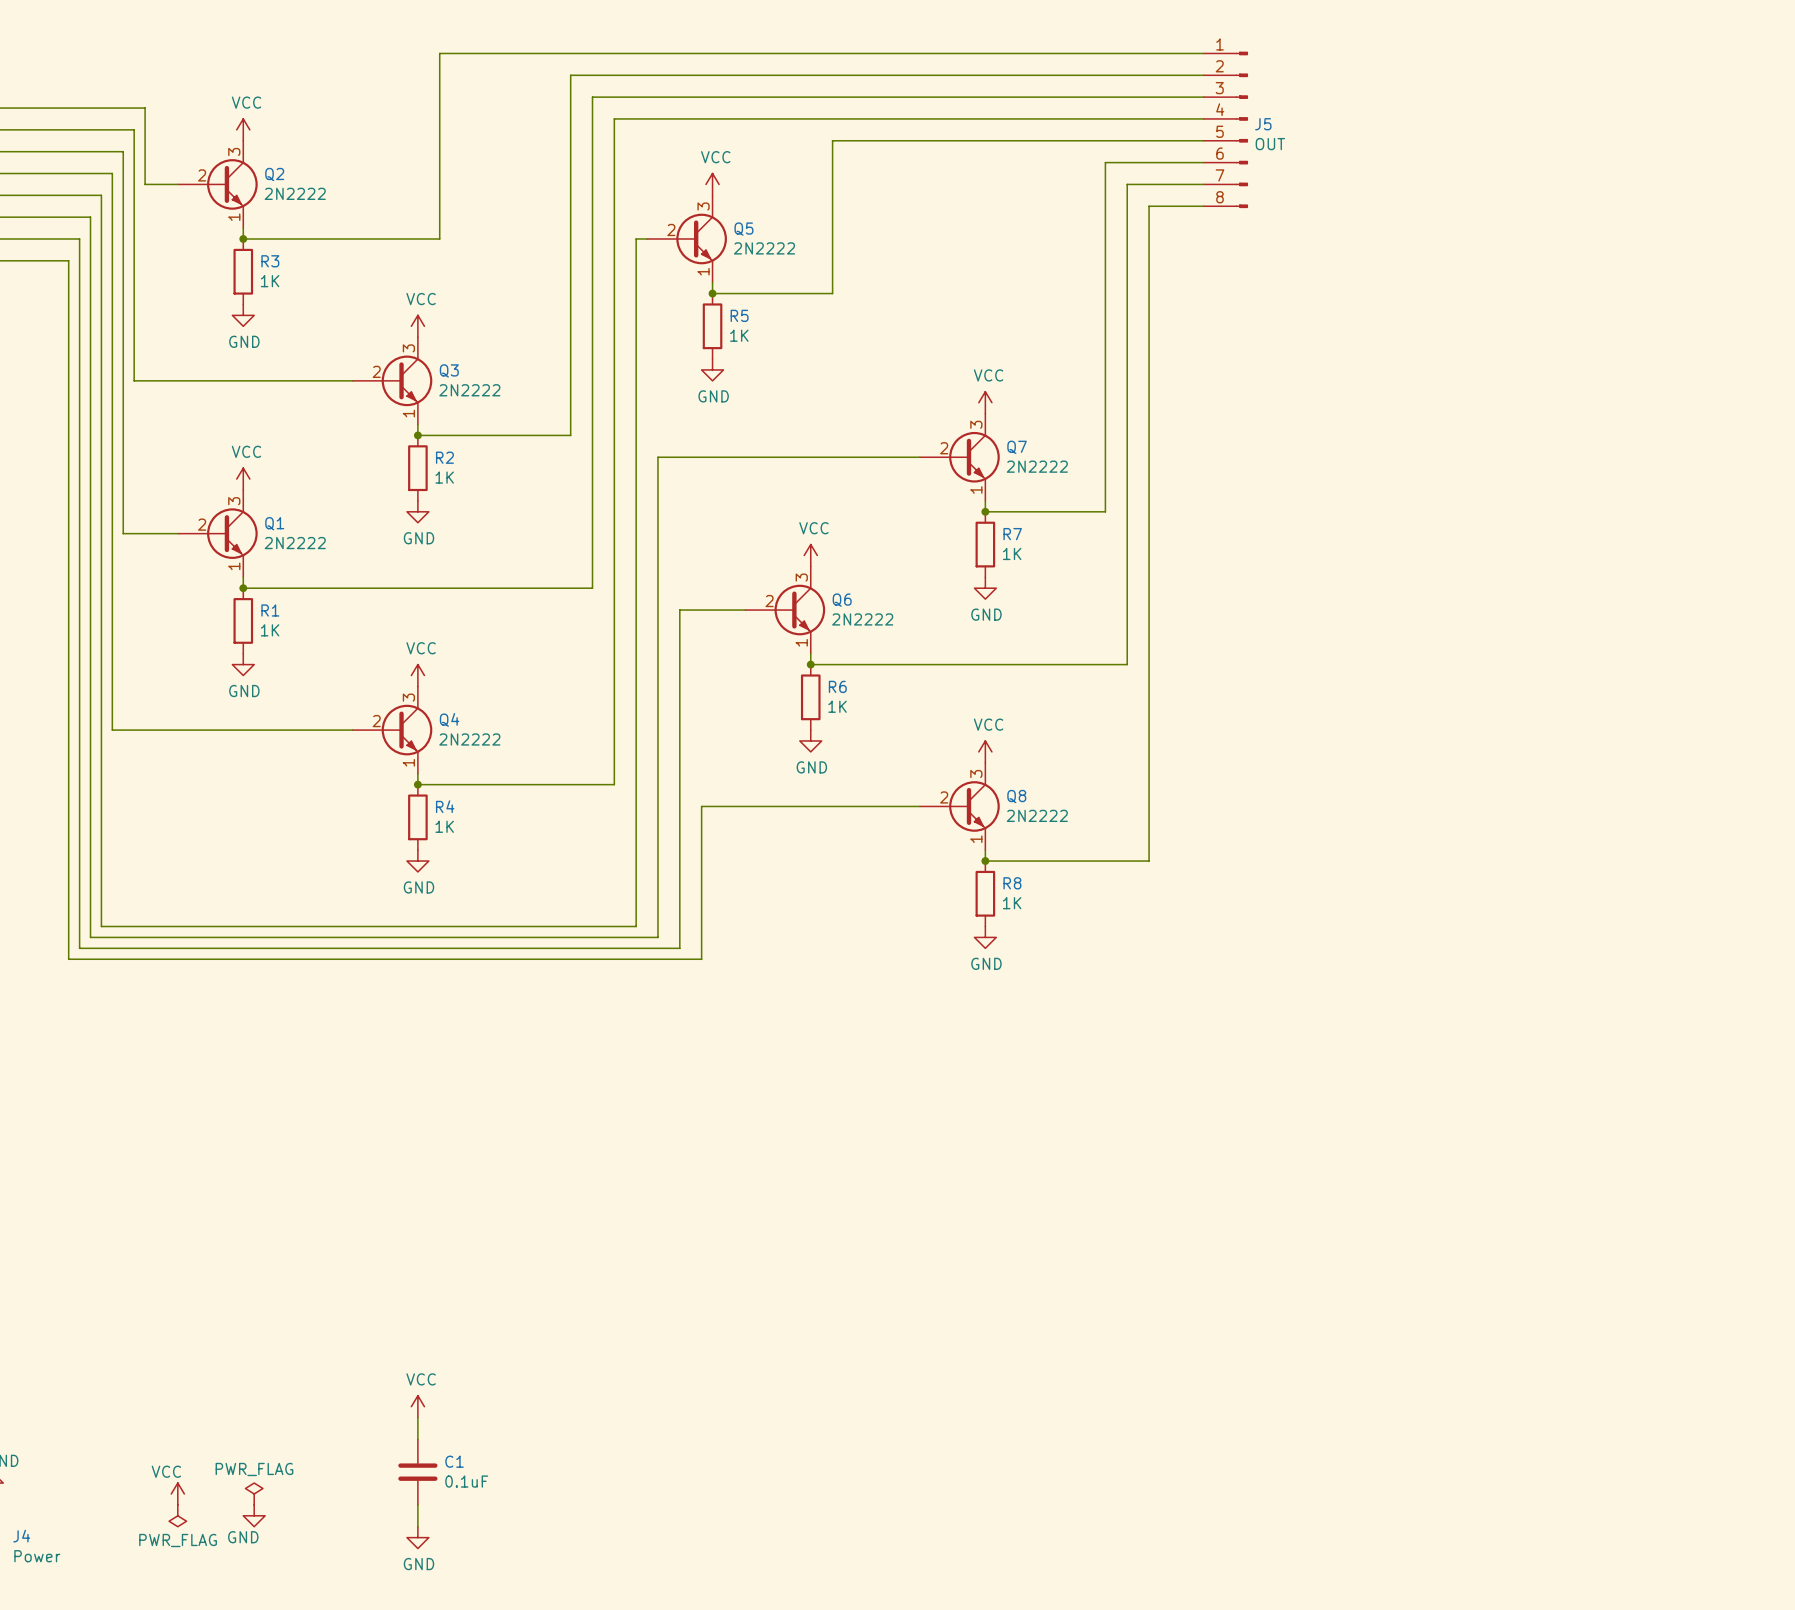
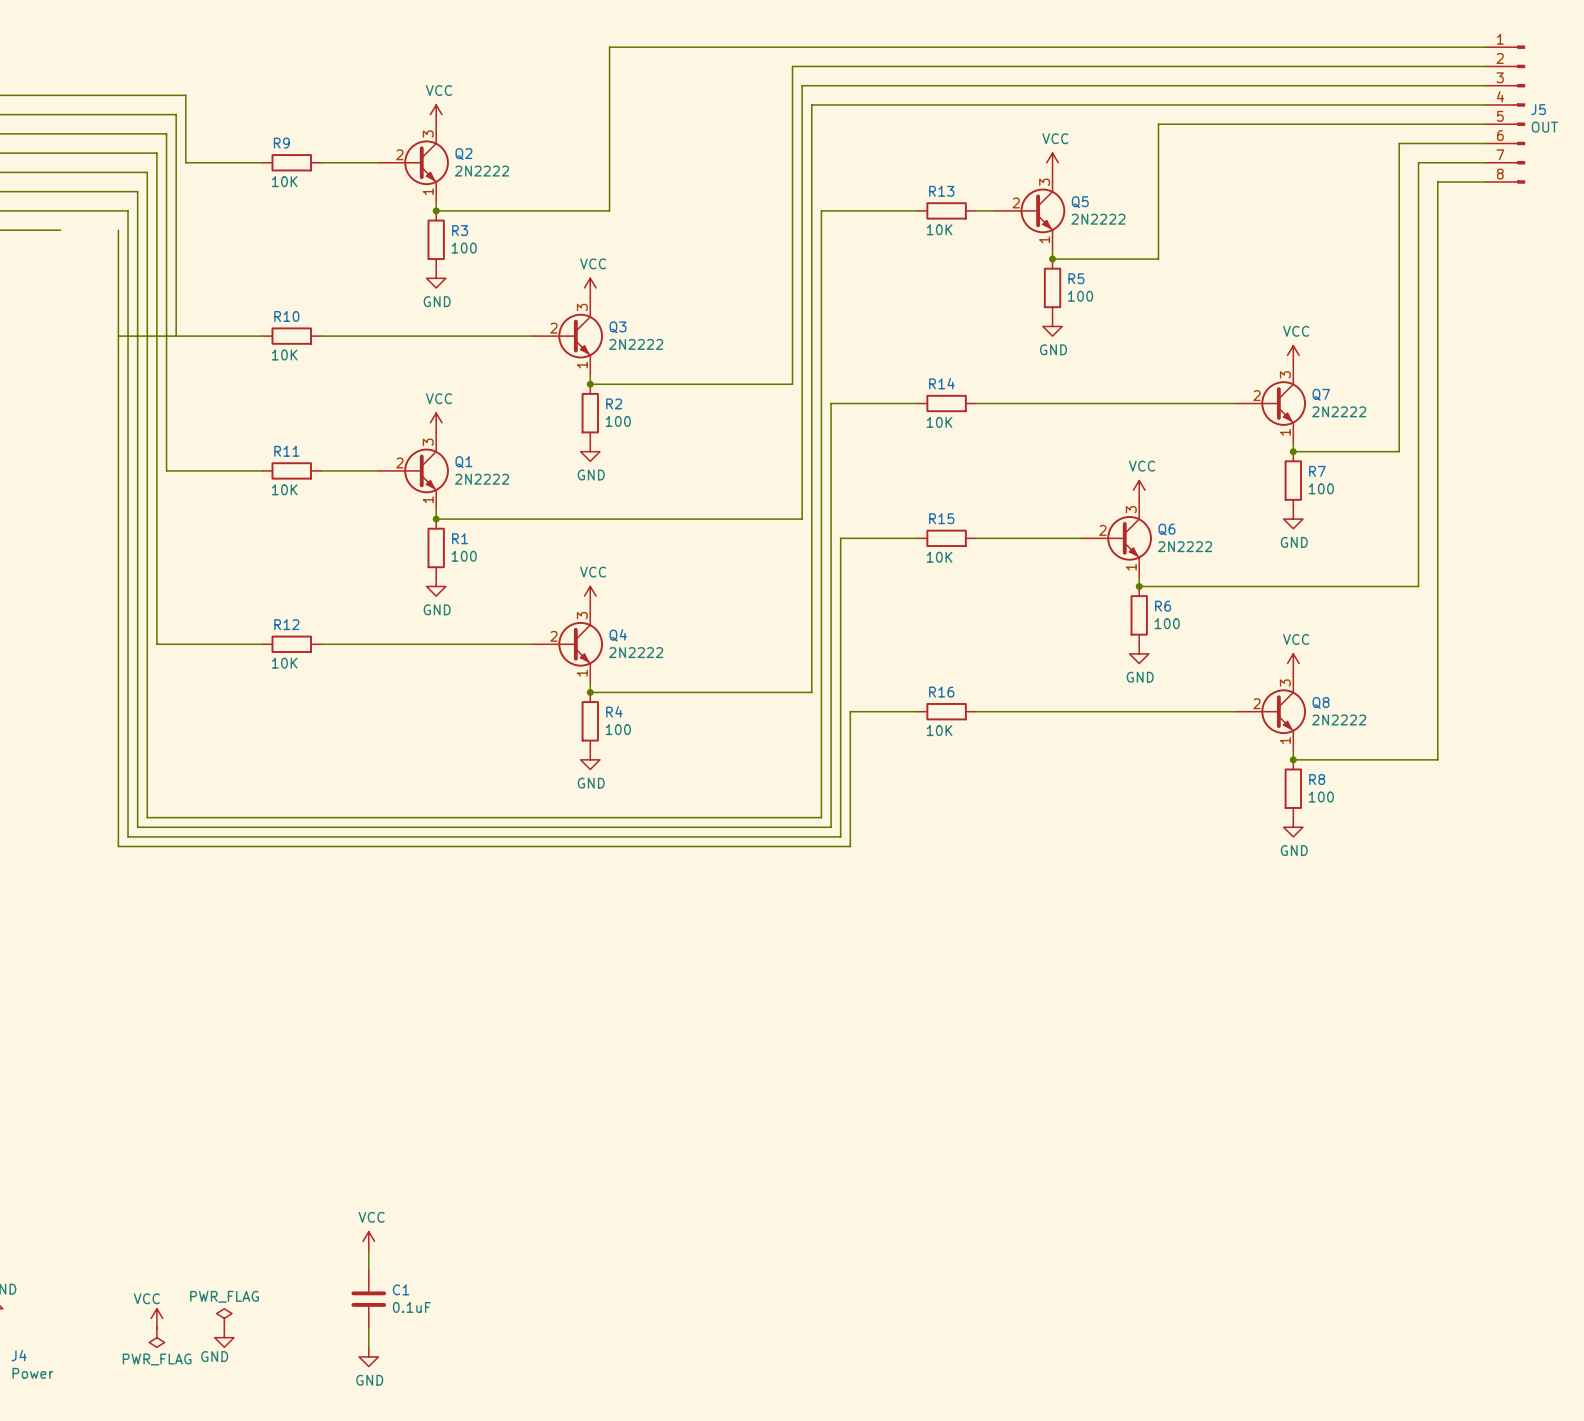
wire: (690, 53) (439, 53) (439, 238) (243, 238) (243, 228) -> (609, 47) (609, 210) (571, 210)
wire: none -> (1062, 47) (1485, 47)
wire: (898, 75) (570, 75) (570, 435) (417, 435) (417, 424) -> (792, 66) (792, 384) (590, 384) (590, 374)
wire: none -> (1062, 66) (1485, 66)
wire: (908, 97) (592, 97) (592, 588) -> (802, 85) (802, 519) (522, 519)
wire: none -> (1062, 85) (1485, 85)
wire: (145, 108) (145, 184) (177, 184) -> (128, 95) (185, 95) (185, 162) (262, 162)
wire: (919, 118) (614, 118) (614, 784) (417, 784) (417, 773) -> (811, 104) (811, 692) (590, 692) (590, 682)
wire: none -> (1062, 104) (1485, 104)
wire: (134, 129) (134, 260) -> (118, 114) (176, 114) (176, 336)
power symbol: VCC (243, 129) -> none
power symbol: none -> VCC (436, 114)
J5 position: (1225, 129) -> (1505, 114)
wire: (1203, 140) (832, 140) (832, 293) (712, 293) (712, 282) -> none
wire: none -> (1485, 124) (1158, 124) (1158, 259) (1052, 259) (1052, 249)
wire: (123, 151) (123, 533) (177, 533) -> (108, 133) (166, 133) (166, 470) (262, 470)
wire: (1203, 162) (1105, 162) (1105, 511) (985, 511) (985, 500) -> none
wire: none -> (1485, 143) (1399, 143) (1399, 451) (1293, 451) (1293, 442)
wire: (112, 173) (112, 730) (177, 730) -> (99, 153) (156, 153) (156, 644)
Q2 position: (217, 184) -> (413, 162)
R9: none -> 10K (291, 162)
wire: none -> (320, 162) (378, 162)
power symbol: VCC (712, 184) -> none
power symbol: none -> VCC (1052, 162)
wire: (1203, 184) (1127, 184) (1127, 664) (810, 664) (810, 653) -> none
wire: none -> (1485, 162) (1418, 162) (1418, 586) (1139, 586) (1139, 576)
wire: (101, 195) (101, 926) (166, 926) -> (89, 172) (147, 172) (147, 817)
wire: (1203, 206) (1149, 206) (1149, 861) (985, 861) (985, 850) -> none
wire: none -> (1485, 182) (1437, 182) (1437, 759) (1293, 759) (1293, 750)
wire: (90, 217) (90, 937) (155, 937) -> (79, 191) (137, 191) (137, 827)
wire: none -> (436, 201) (436, 210) (561, 210)
wire: (79, 238) (79, 948) (145, 948) -> (70, 210) (128, 210) (128, 836)
junction: (243, 238) -> none
junction: none -> (436, 210)
wire: (636, 238) (636, 926) -> (917, 210) (821, 210) (821, 817) (561, 817)
Q5 position: (687, 238) -> (1030, 210)
R13: none -> 10K (946, 210)
wire: none -> (975, 210) (994, 210)
wire: (68, 260) (68, 959) (134, 959) -> (118, 336) (118, 846)
R3 position: (243, 271) -> (436, 239)
R3 value: 1K (270, 281) -> 100 (464, 248)
junction: (712, 293) -> none
junction: none -> (1052, 259)
power symbol: GND (243, 315) -> none
power symbol: none -> GND (436, 278)
power symbol: VCC (417, 326) -> none
power symbol: none -> VCC (590, 287)
R5 position: (712, 326) -> (1052, 287)
R5 value: 1K (739, 335) -> 100 (1080, 296)
power symbol: GND (712, 369) -> none
power symbol: none -> GND (1052, 326)
wire: (297, 380) (352, 380) -> none
R10: none -> 10K (291, 336)
wire: none -> (320, 336) (532, 336)
Q3 position: (392, 380) -> (567, 336)
power symbol: VCC (985, 402) -> none
power symbol: none -> VCC (1293, 355)
junction: (417, 435) -> none
junction: none -> (590, 384)
wire: (919, 457) (657, 457) (657, 937) -> (917, 403) (831, 403) (831, 827) (580, 827)
Q7 position: (959, 457) -> (1270, 403)
R14: none -> 10K (946, 403)
wire: none -> (975, 403) (1235, 403)
R2 position: (417, 468) -> (590, 413)
R2 value: 1K (444, 477) -> 100 (618, 421)
power symbol: VCC (243, 479) -> none
power symbol: none -> VCC (436, 422)
power symbol: GND (417, 511) -> none
power symbol: none -> GND (590, 451)
junction: (985, 511) -> none
junction: none -> (1293, 451)
Q1 position: (217, 533) -> (413, 470)
R11: none -> 10K (291, 470)
wire: none -> (320, 470) (378, 470)
R7 position: (985, 544) -> (1293, 480)
R7 value: 1K (1012, 553) -> 100 (1321, 488)
power symbol: VCC (810, 555) -> none
power symbol: none -> VCC (1139, 490)
wire: (243, 577) (243, 588) (494, 588) -> (436, 509) (436, 519)
junction: (243, 588) -> none
junction: none -> (436, 519)
power symbol: GND (985, 588) -> none
power symbol: none -> GND (1293, 519)
wire: (745, 610) (679, 610) (679, 948) -> (917, 538) (840, 538) (840, 836) (599, 836)
Q6 position: (785, 610) -> (1116, 538)
R15: none -> 10K (946, 538)
wire: none -> (975, 538) (1081, 538)
R1 position: (243, 620) -> (436, 547)
R1 value: 1K (270, 630) -> 100 (464, 556)
power symbol: GND (243, 664) -> none
power symbol: none -> GND (436, 586)
junction: (810, 664) -> none
junction: none -> (1139, 586)
power symbol: VCC (417, 675) -> none
power symbol: none -> VCC (590, 596)
R6 position: (810, 697) -> (1139, 615)
R6 value: 1K (837, 706) -> 100 (1167, 623)
wire: (297, 730) (352, 730) -> none
R12: none -> 10K (291, 644)
wire: none -> (320, 644) (532, 644)
Q4 position: (392, 730) -> (567, 644)
power symbol: GND (810, 740) -> none
power symbol: none -> GND (1139, 653)
power symbol: VCC (985, 751) -> none
power symbol: none -> VCC (1293, 663)
junction: (417, 784) -> none
junction: none -> (590, 692)
wire: (919, 806) (701, 806) (701, 959) -> (917, 711) (850, 711) (850, 846) (619, 846)
Q8 position: (959, 806) -> (1270, 711)
R16: none -> 10K (946, 711)
wire: none -> (975, 711) (1235, 711)
R4 position: (417, 817) -> (590, 721)
R4 value: 1K (444, 826) -> 100 (618, 729)
power symbol: GND (417, 861) -> none
power symbol: none -> GND (590, 759)
junction: (985, 861) -> none
junction: none -> (1293, 759)
R8 position: (985, 893) -> (1293, 788)
R8 value: 1K (1012, 903) -> 100 (1321, 797)
power symbol: GND (985, 937) -> none
power symbol: none -> GND (1293, 827)

